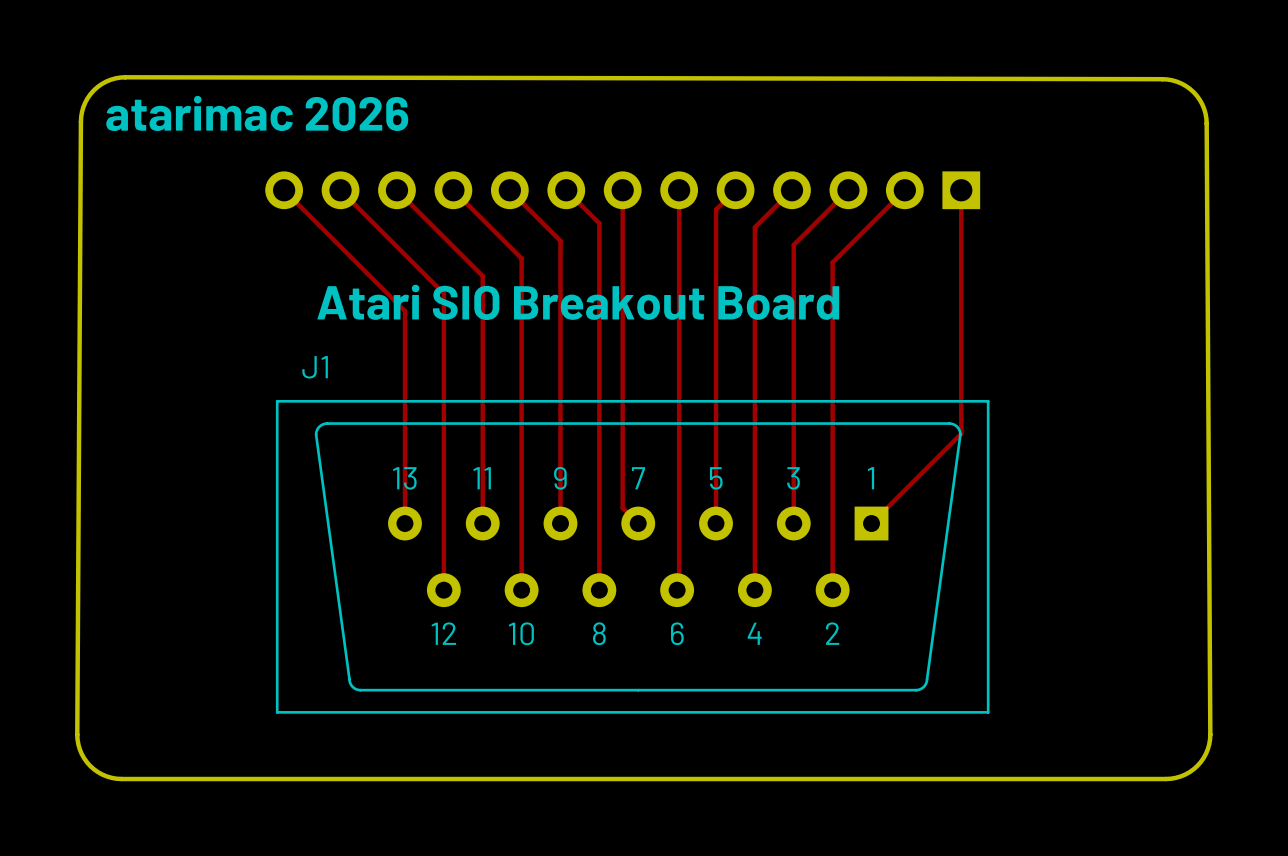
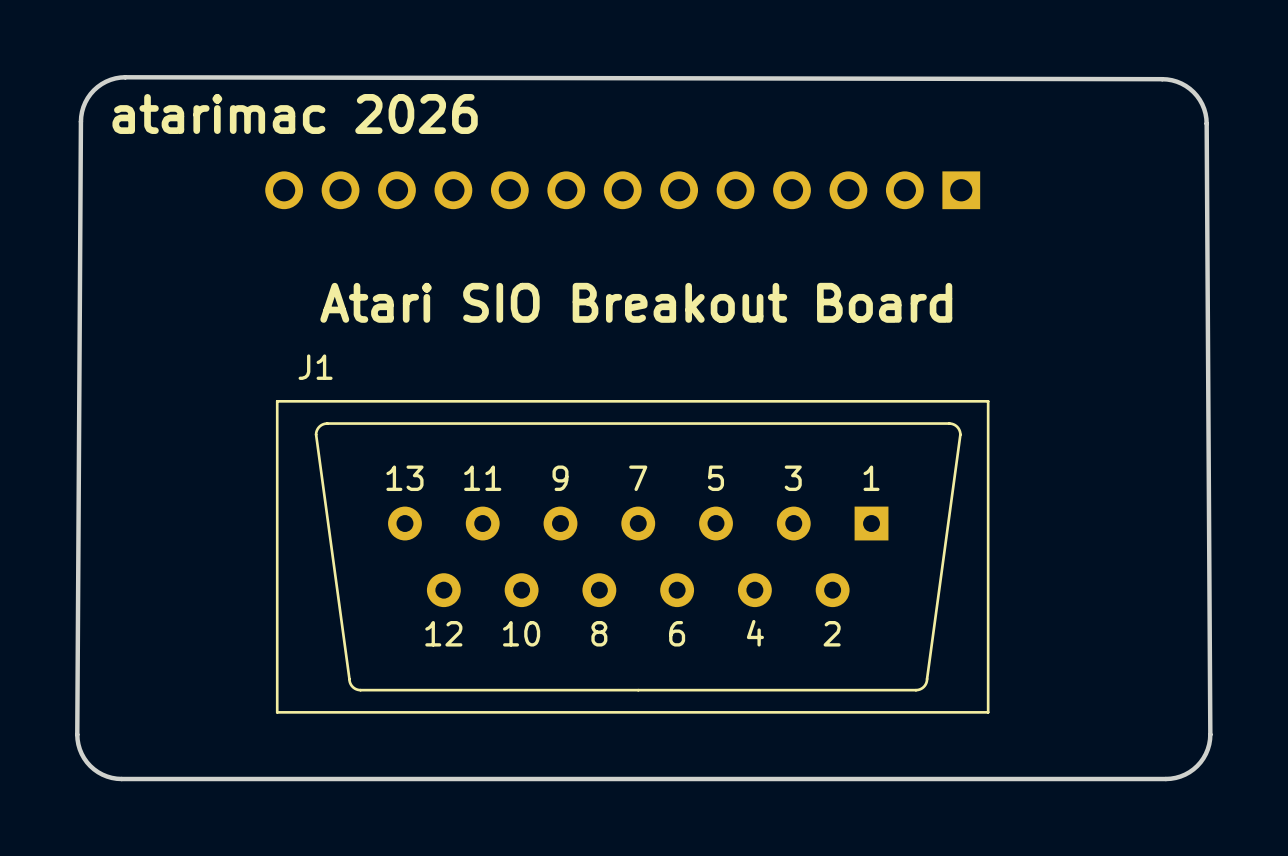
top track: (284, 190) (404, 311) (404, 523) -> none
top track: (340, 190) (443, 293) (443, 590) -> none
top track: (396, 190) (482, 276) (482, 523) -> none
top track: (453, 190) (521, 258) (521, 590) -> none
top track: (509, 190) (560, 240) (560, 523) -> none
top track: (566, 190) (599, 223) (599, 590) -> none
top track: (622, 190) (622, 507) (638, 523) -> none
top track: (679, 190) (679, 588) (677, 590) -> none
top track: (735, 190) (716, 209) (716, 523) -> none
top track: (791, 190) (754, 227) (754, 590) -> none
top track: (848, 190) (793, 244) (793, 523) -> none
top track: (904, 190) (832, 262) (832, 590) -> none
top track: (961, 190) (961, 433) (871, 523) -> none

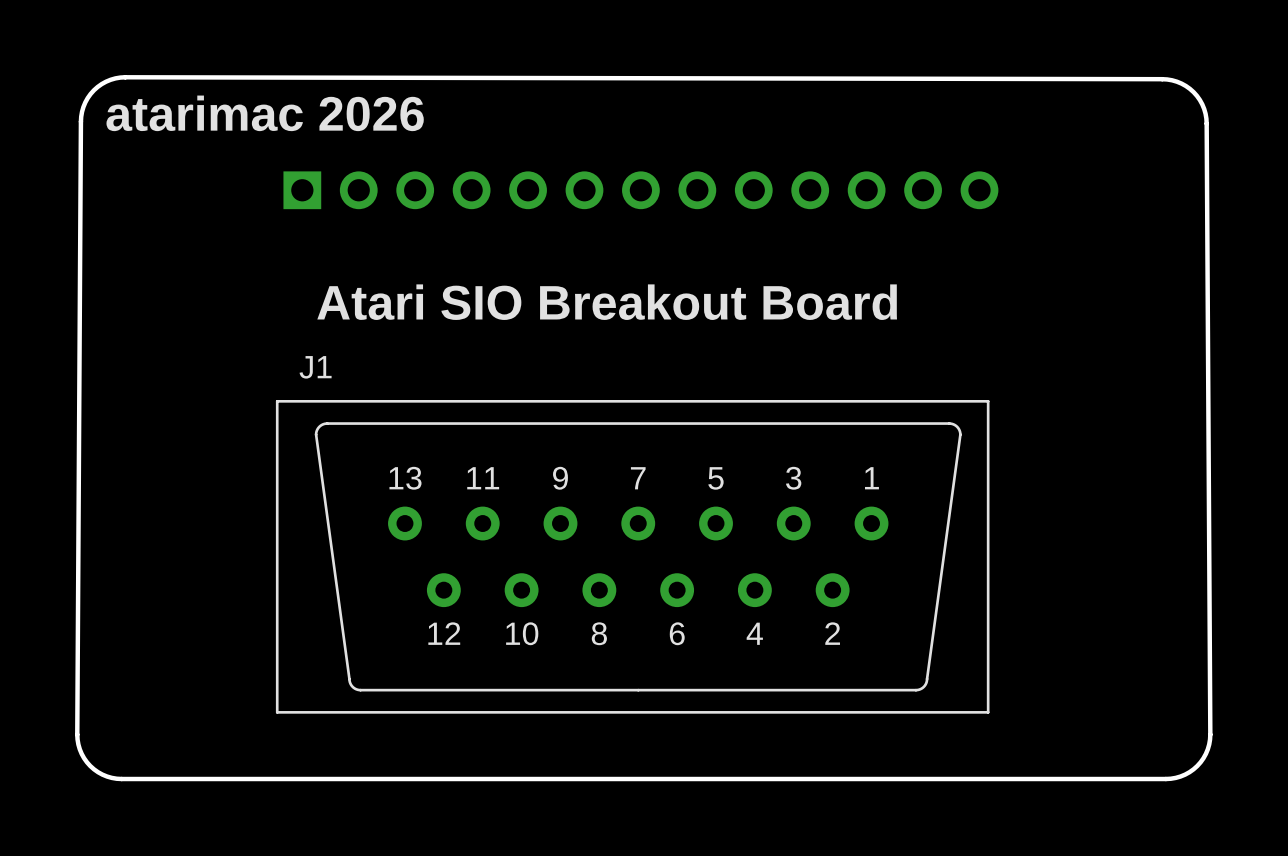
part rotation: 0° (622, 190) -> 180° (640, 190)
J1 footprint: [275, 399, 990, 714] -> [275, 399, 990, 714]

